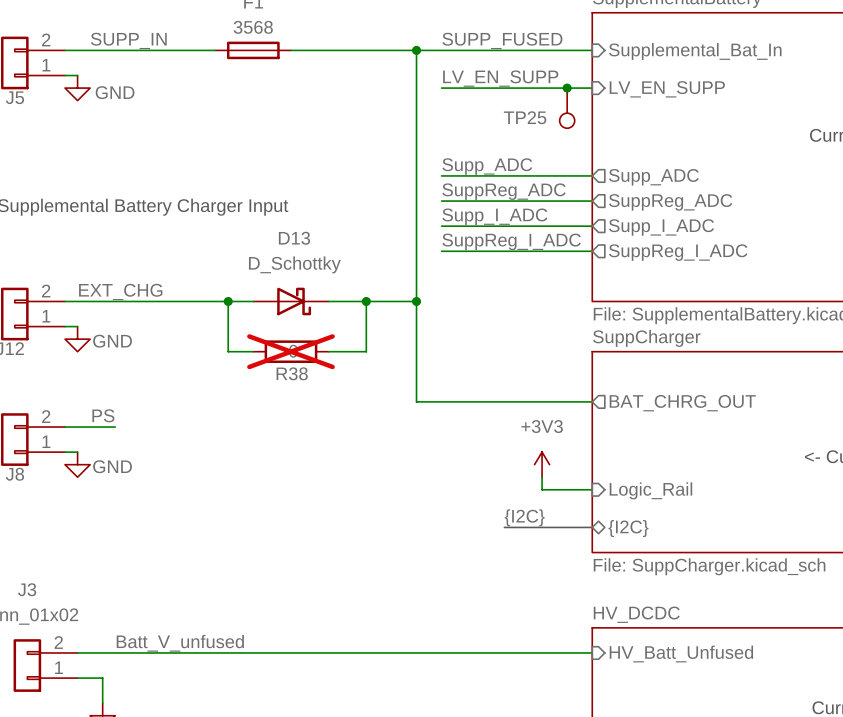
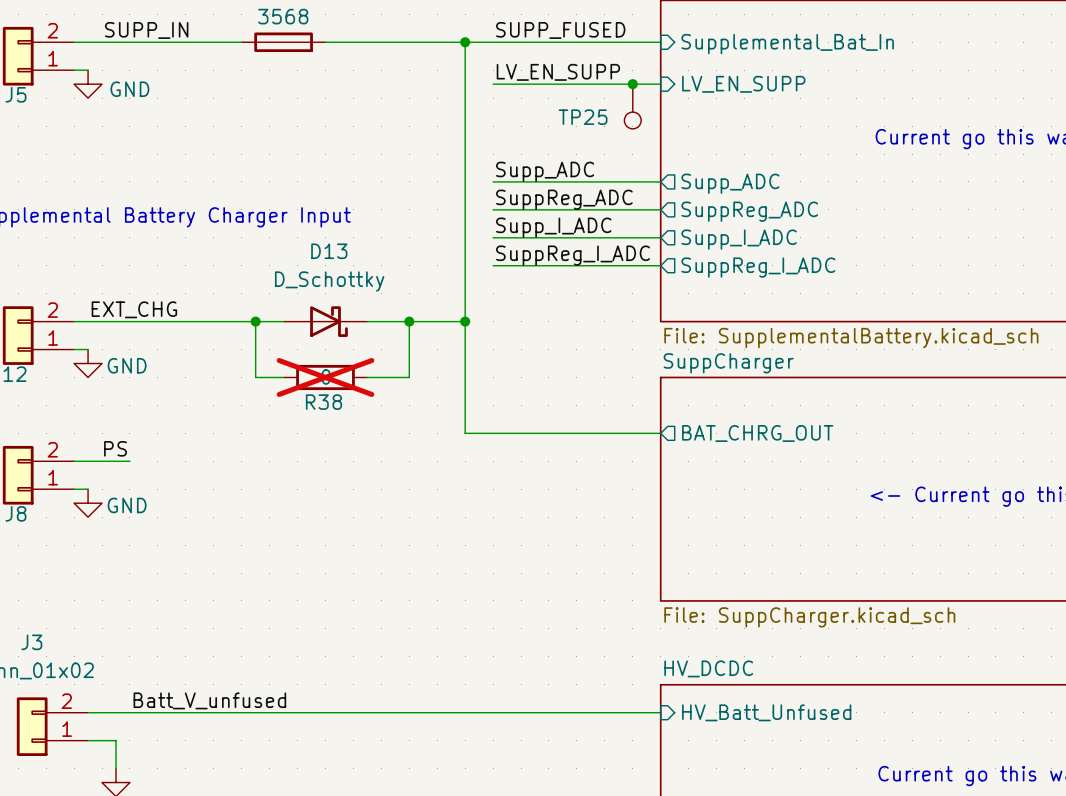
power symbol: +3V3 (542, 464) -> none
wire: (542, 477) (542, 489) (592, 489) -> none
sheet pin: Logic_Rail (650, 490) -> none
label: {I2C} (524, 517) -> none
bus: (504, 527) (592, 527) -> none
sheet pin: {I2C} (628, 528) -> none

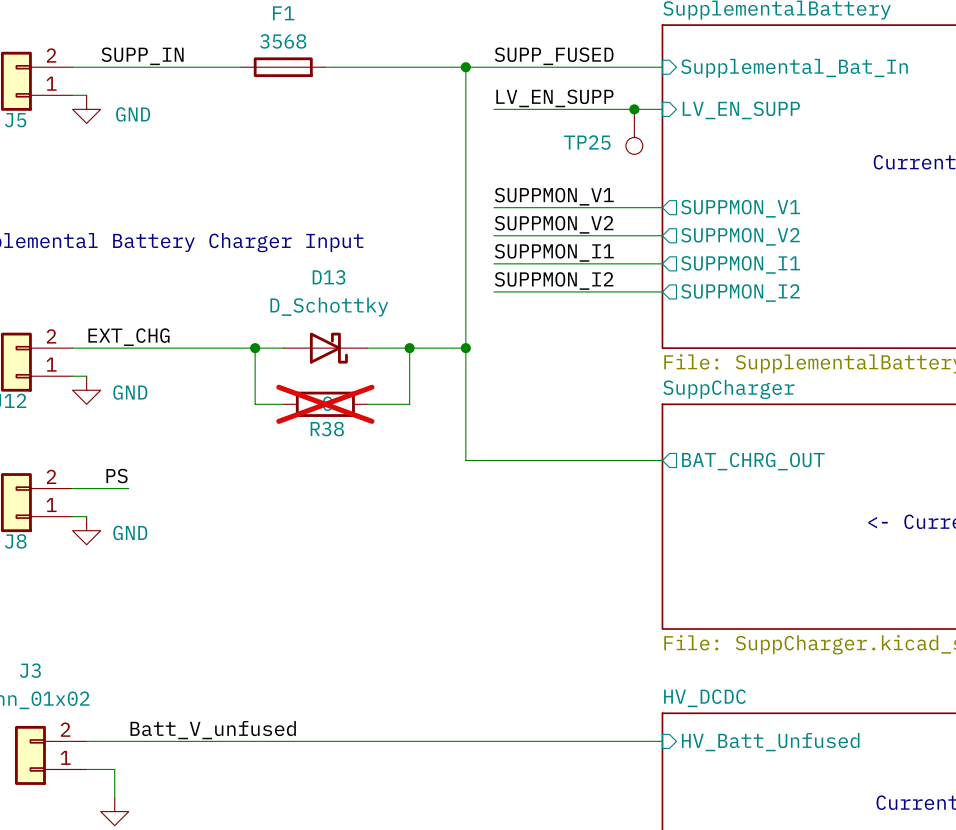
label: Supp_ADC (545, 171) -> SUPPMON_V1 (554, 196)
sheet pin: Supp_ADC (730, 183) -> SUPPMON_V1 (740, 208)
label: SuppReg_ADC (564, 199) -> SUPPMON_V2 (554, 224)
sheet pin: SuppReg_ADC (749, 211) -> SUPPMON_V2 (740, 236)
label: Supp_I_ADC (553, 227) -> SUPPMON_I1 (554, 252)
sheet pin: Supp_I_ADC (739, 239) -> SUPPMON_I1 (740, 264)
label: SuppReg_I_ADC (573, 255) -> SUPPMON_I2 (554, 280)
sheet pin: SuppReg_I_ADC (758, 267) -> SUPPMON_I2 (740, 293)

